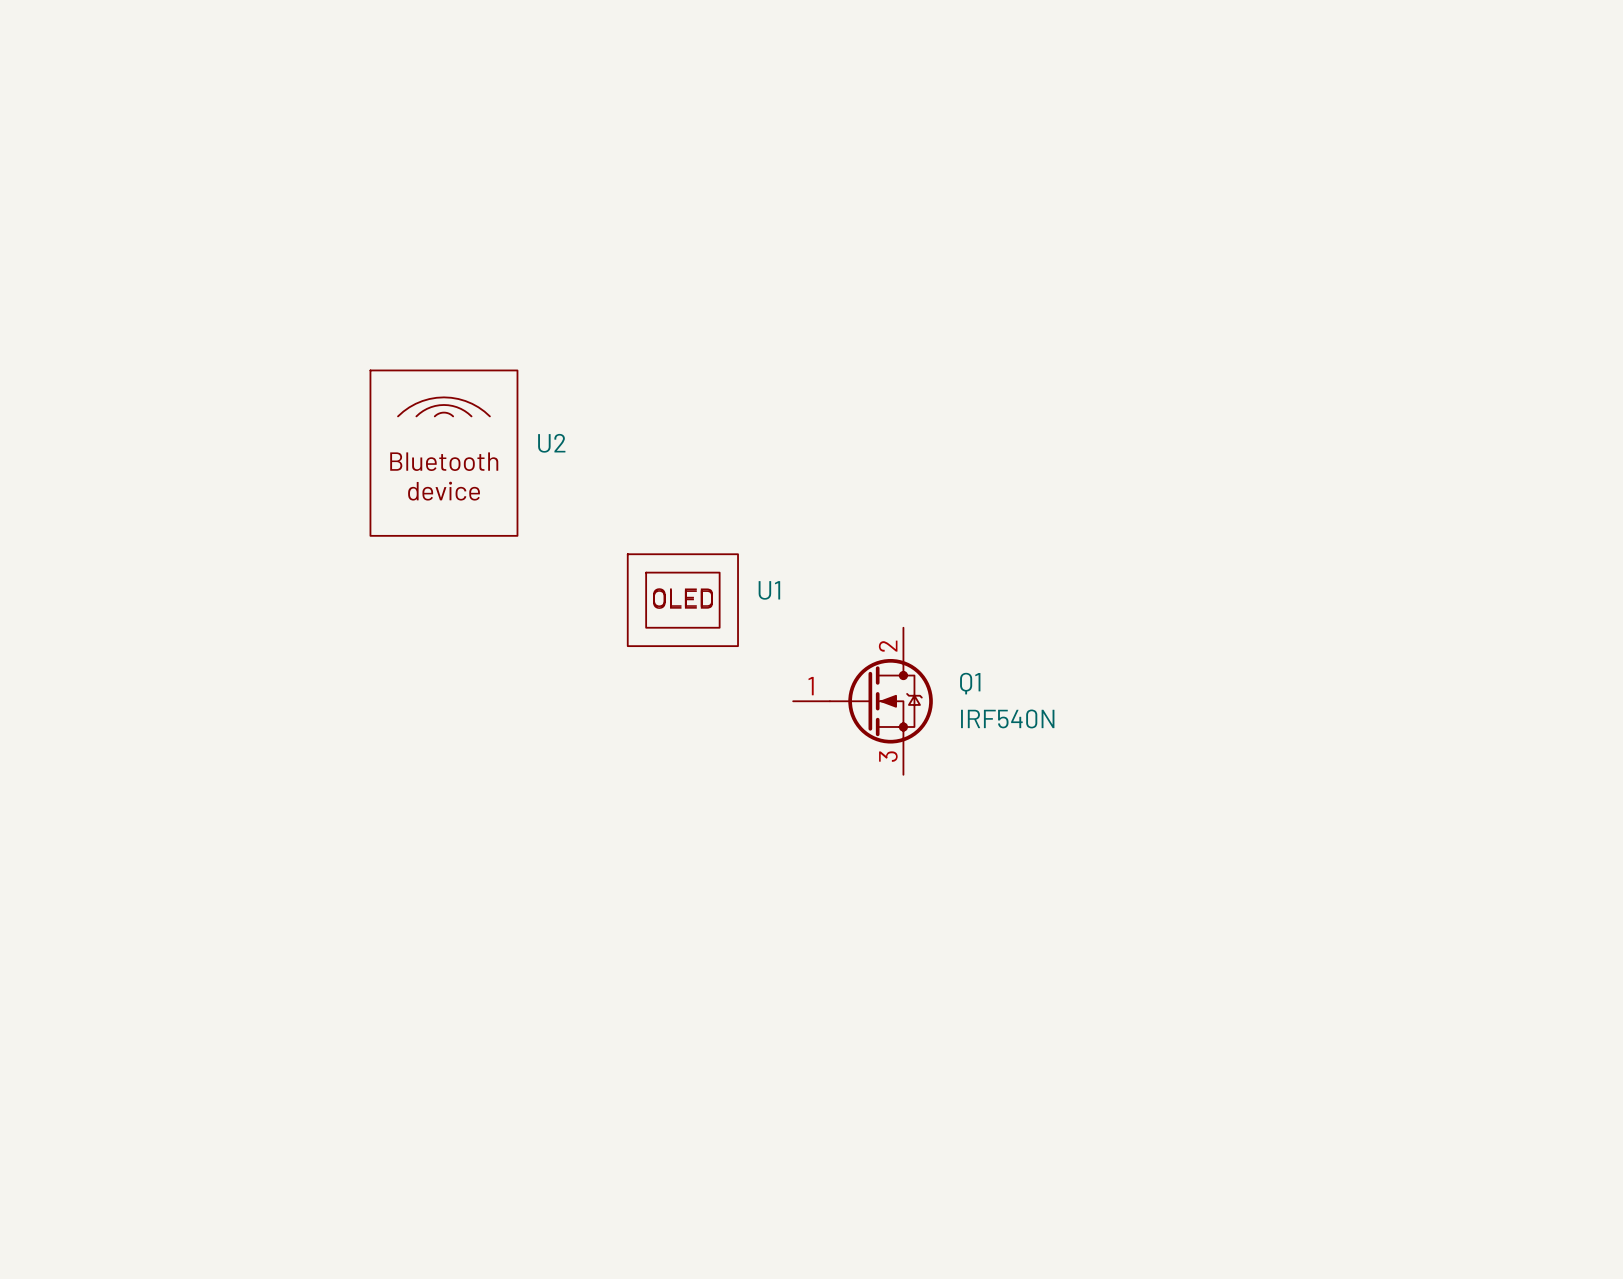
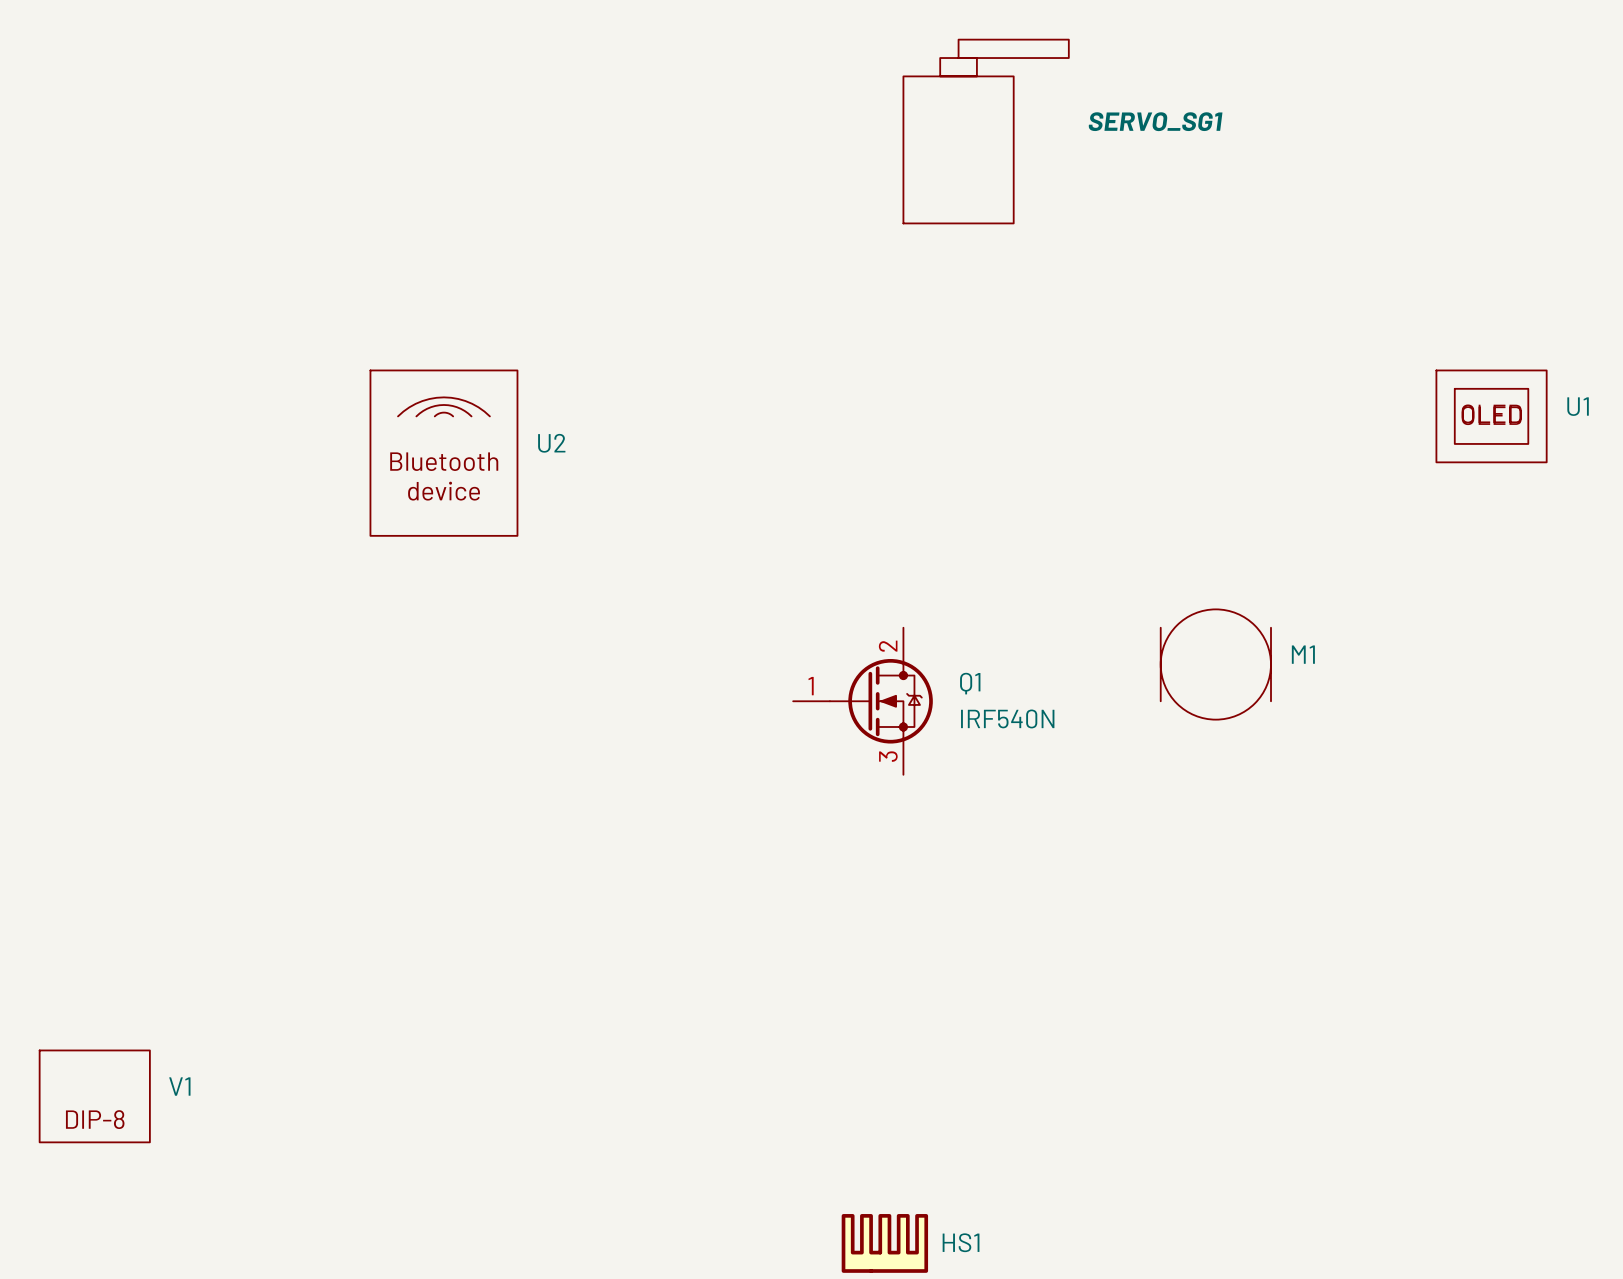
SERVO_SG1: none -> (986, 131)
U1 position: (682, 600) -> (1491, 416)
M1: none -> (1215, 664)
V1: none -> (94, 1096)
HS1: none -> (884, 1243)

